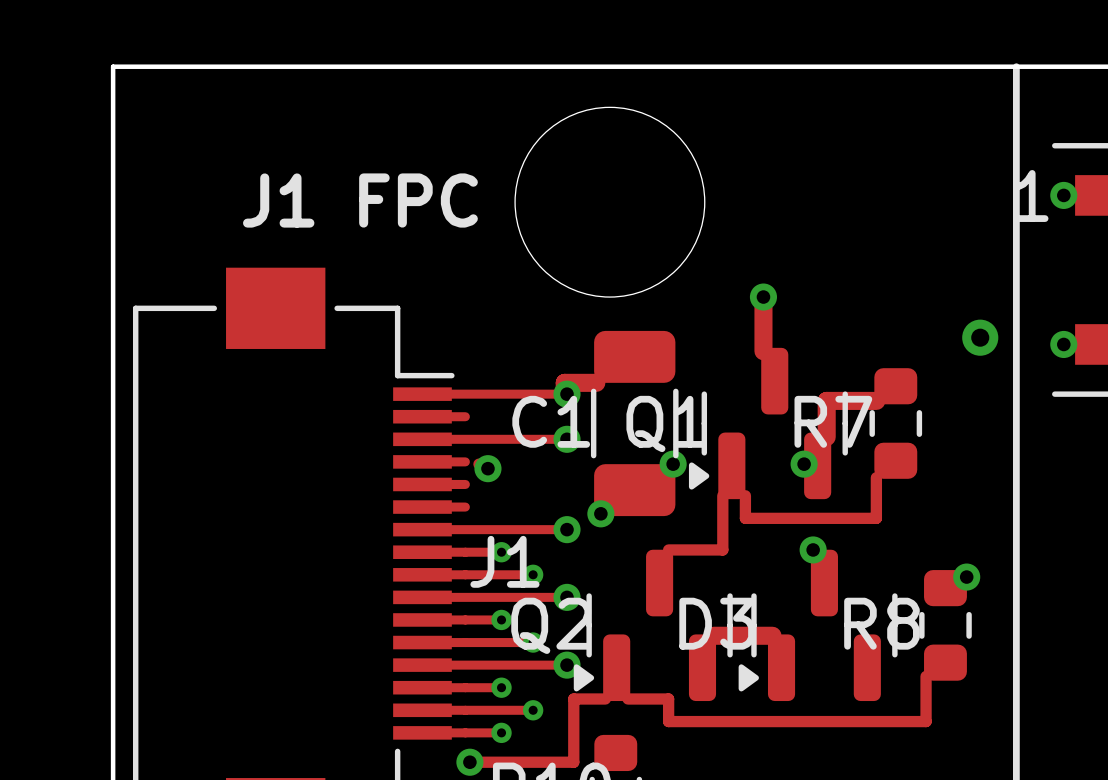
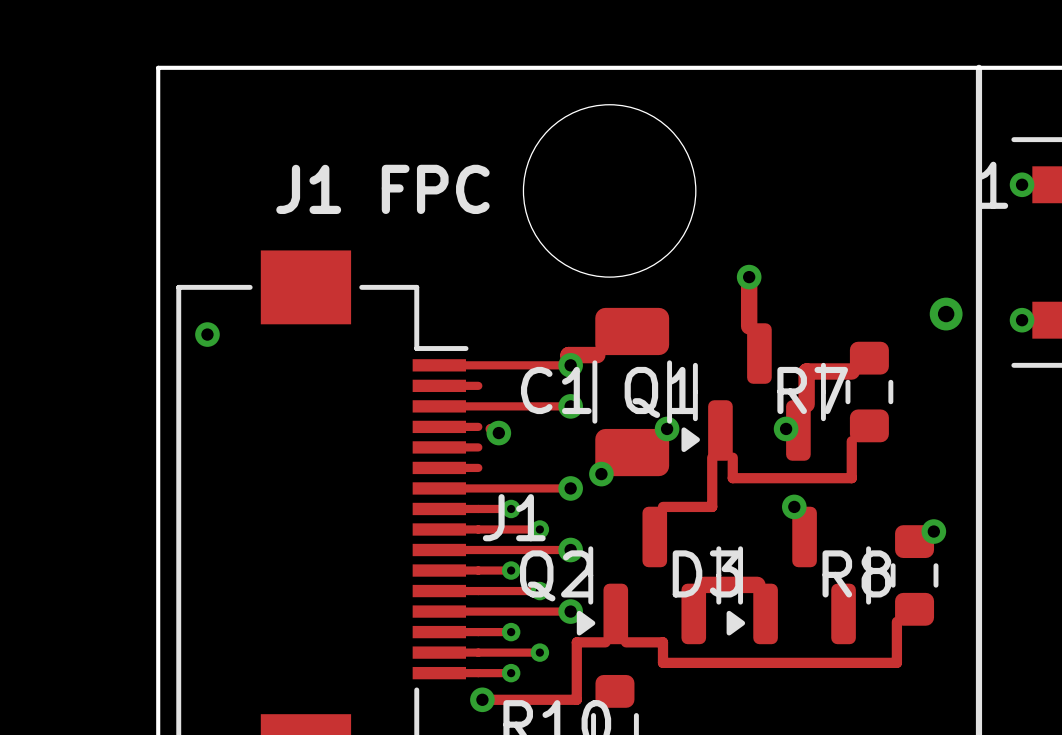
via: none -> (207, 334)

